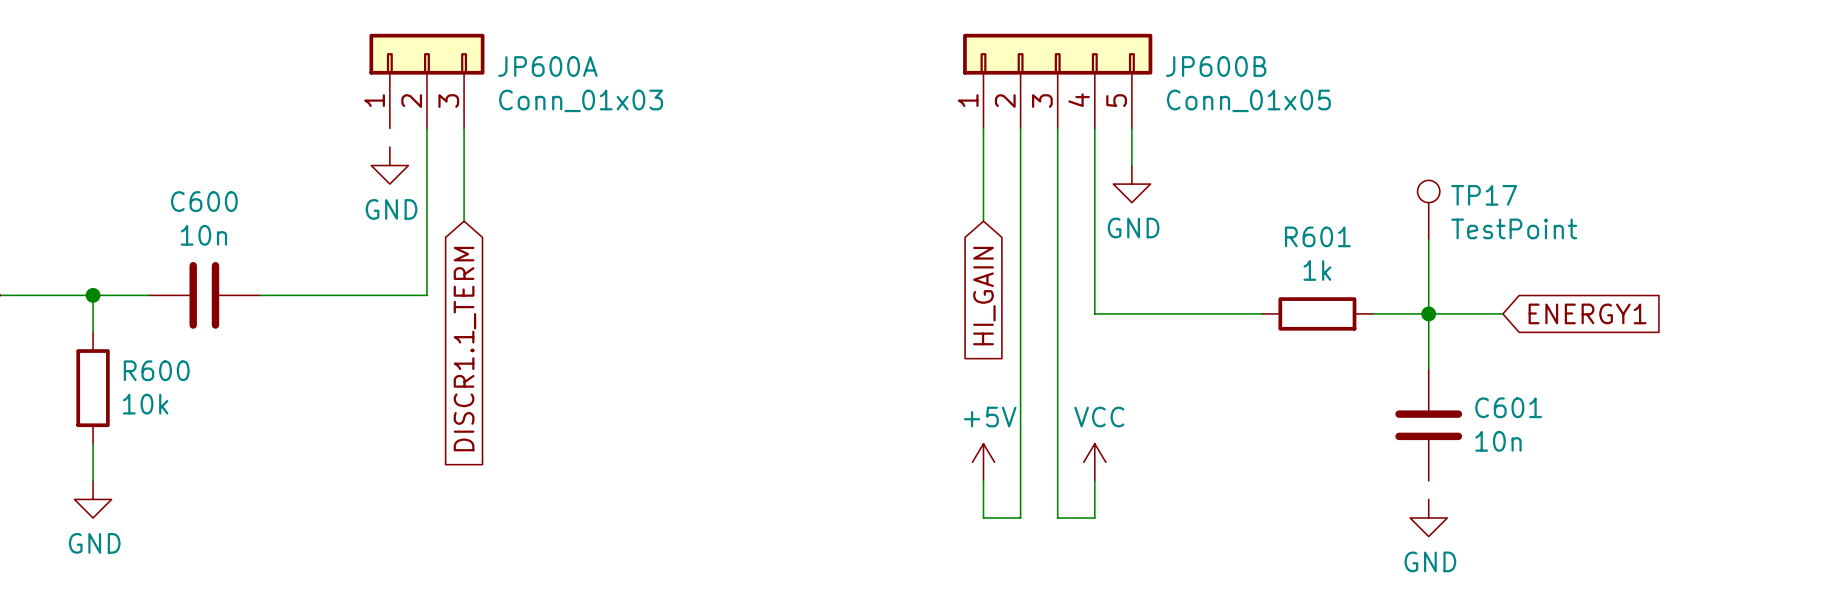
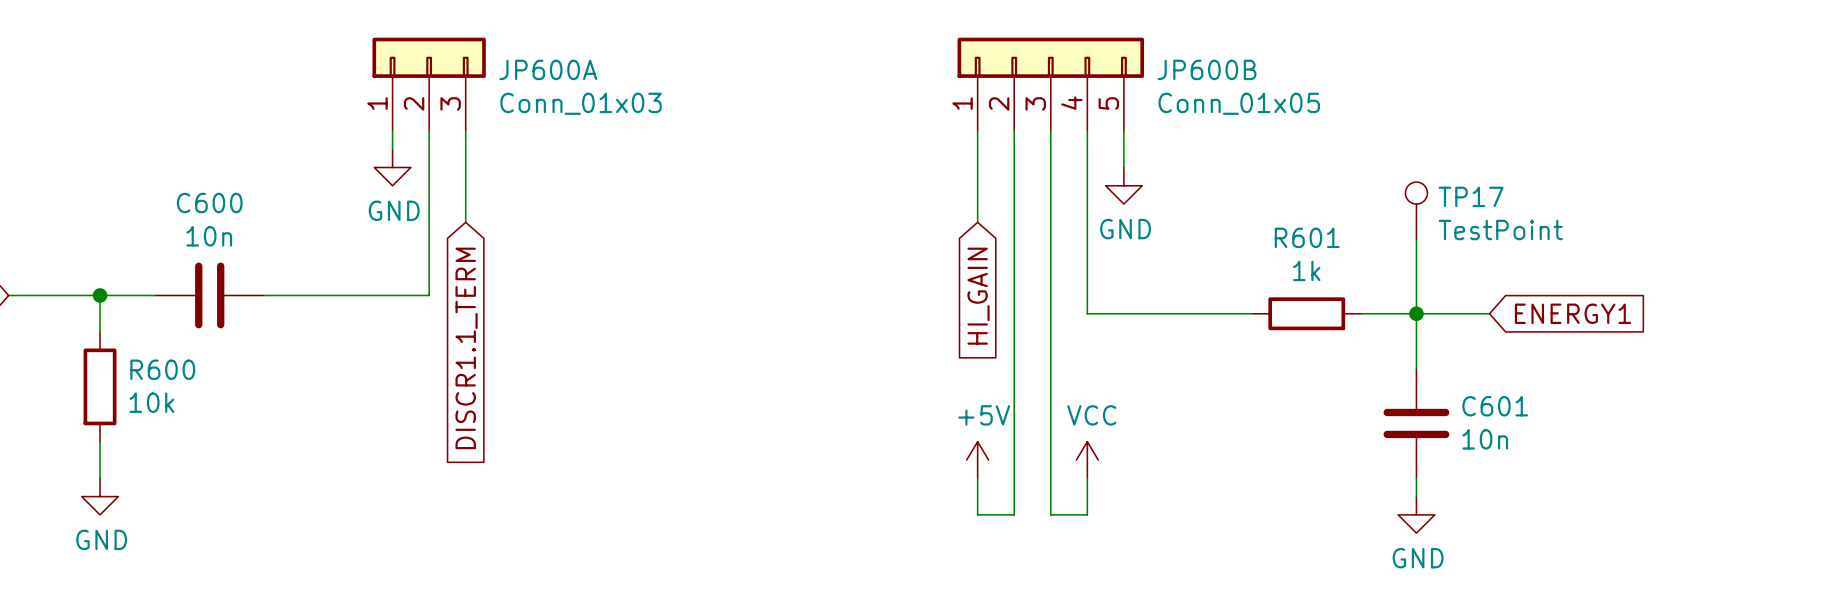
wire: none -> (392, 130) (392, 149)
wire: none -> (1416, 478) (1416, 496)

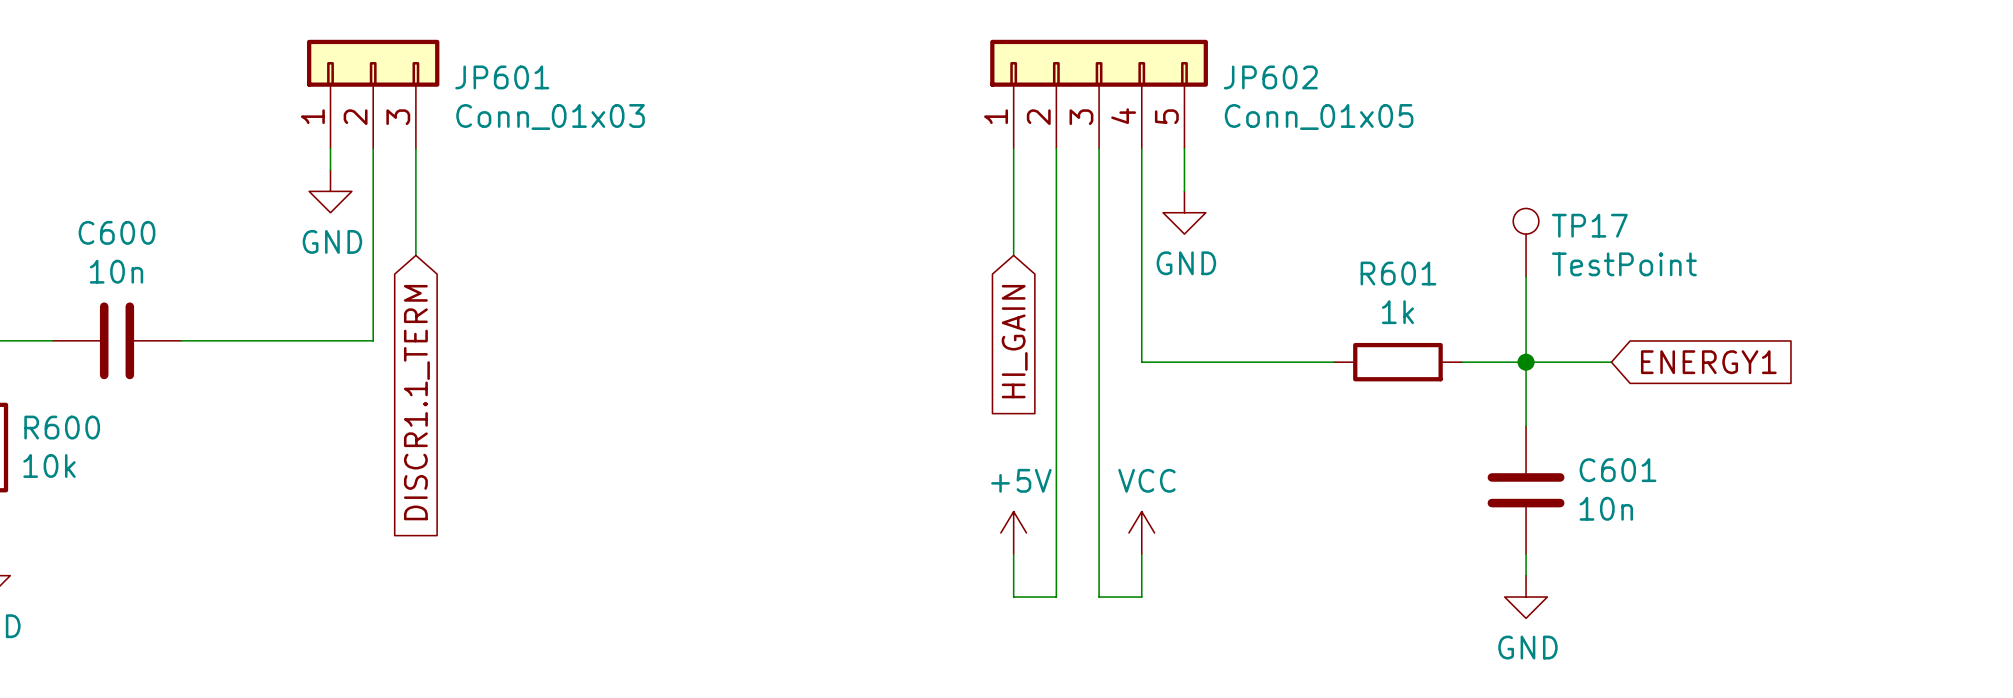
JP600A name: JP600A (548, 69) -> JP601 (502, 77)
JP600B name: JP600B (1207, 69) -> JP602 (1270, 77)

